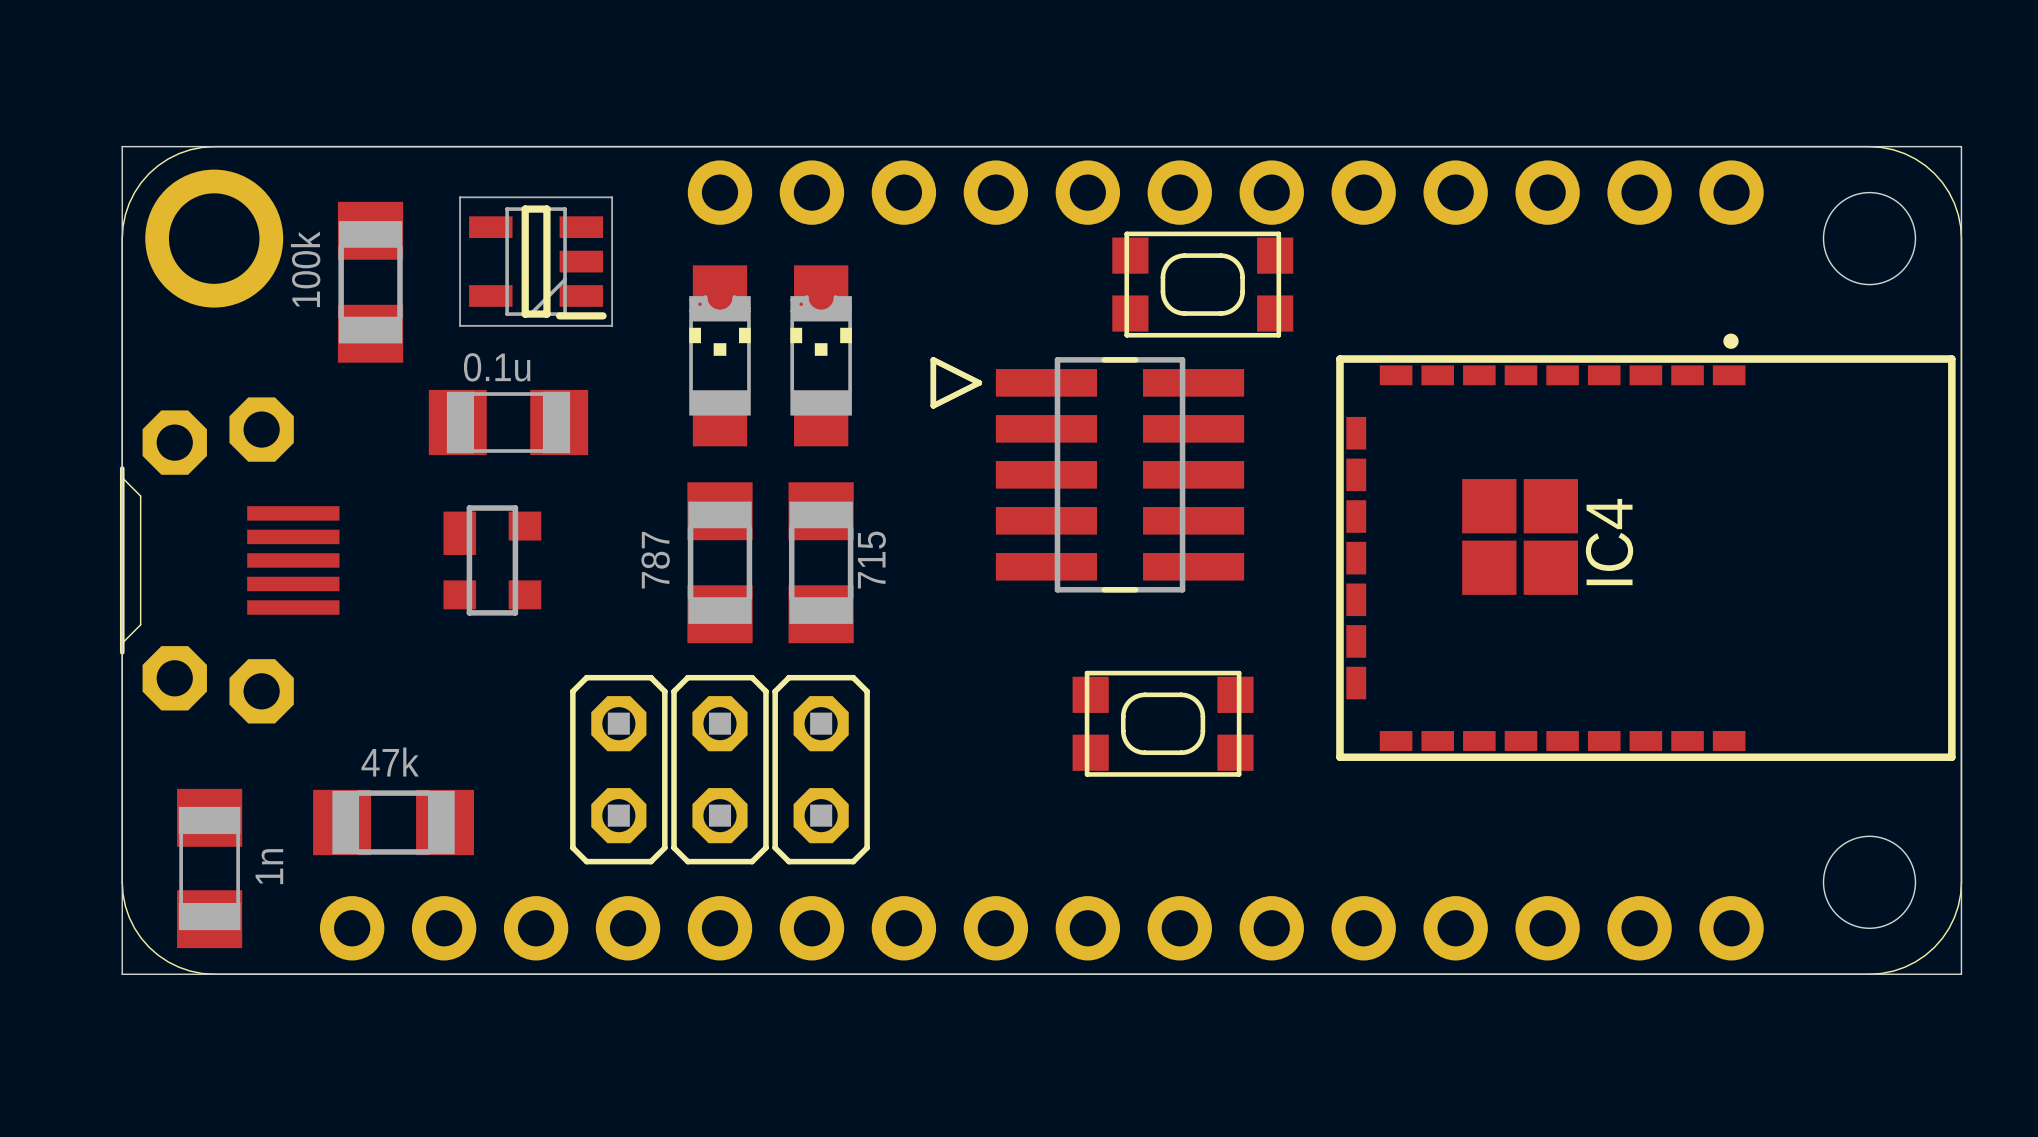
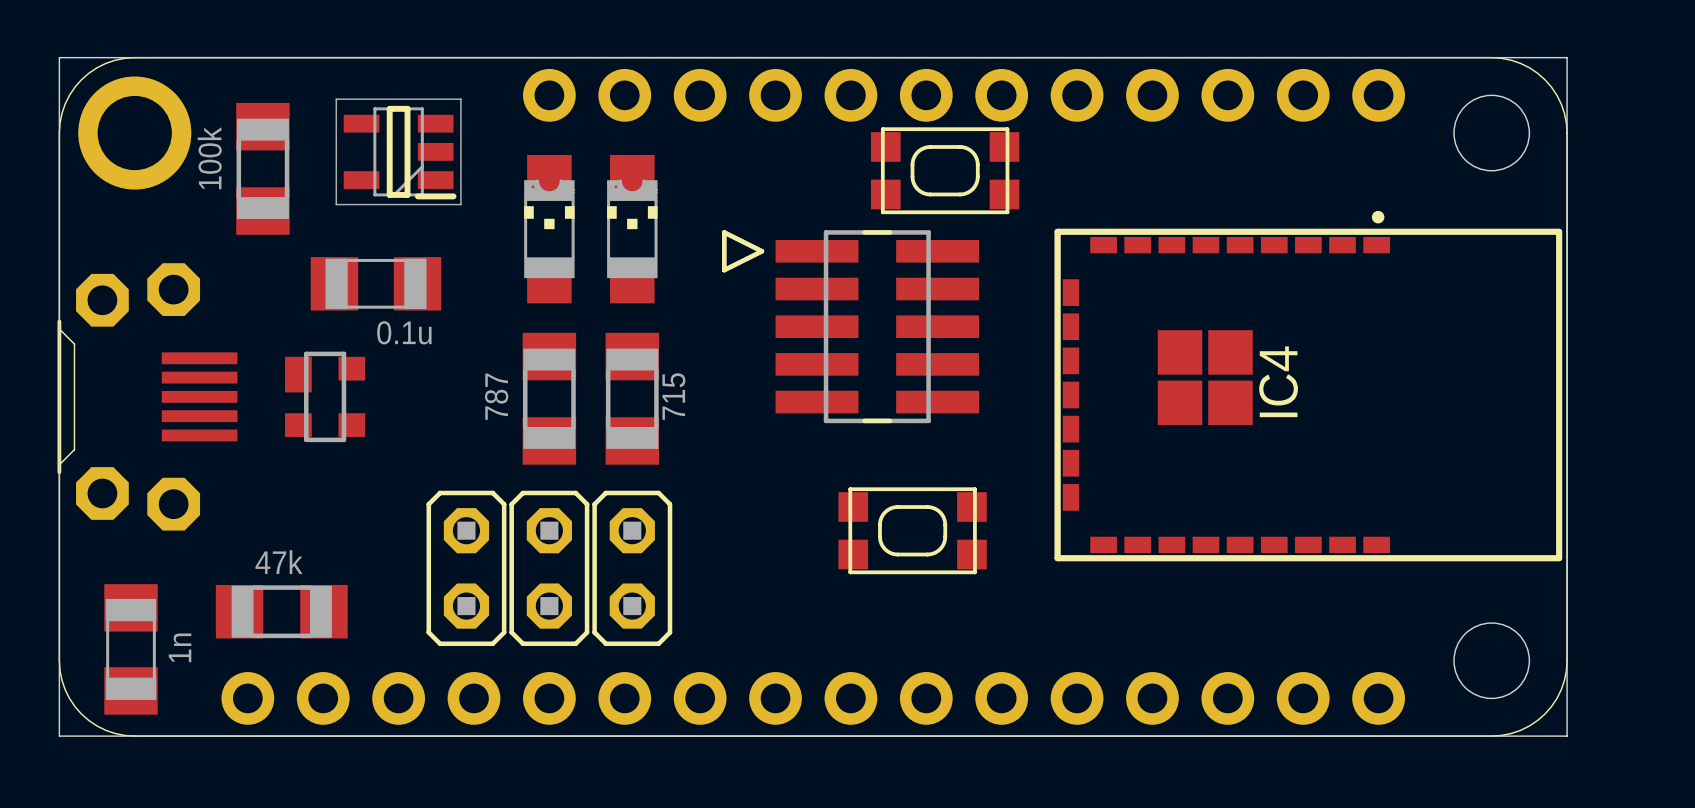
part value position: 0.1u (497, 367) -> 0.1u (404, 332)
part position: (492, 560) -> (325, 396)

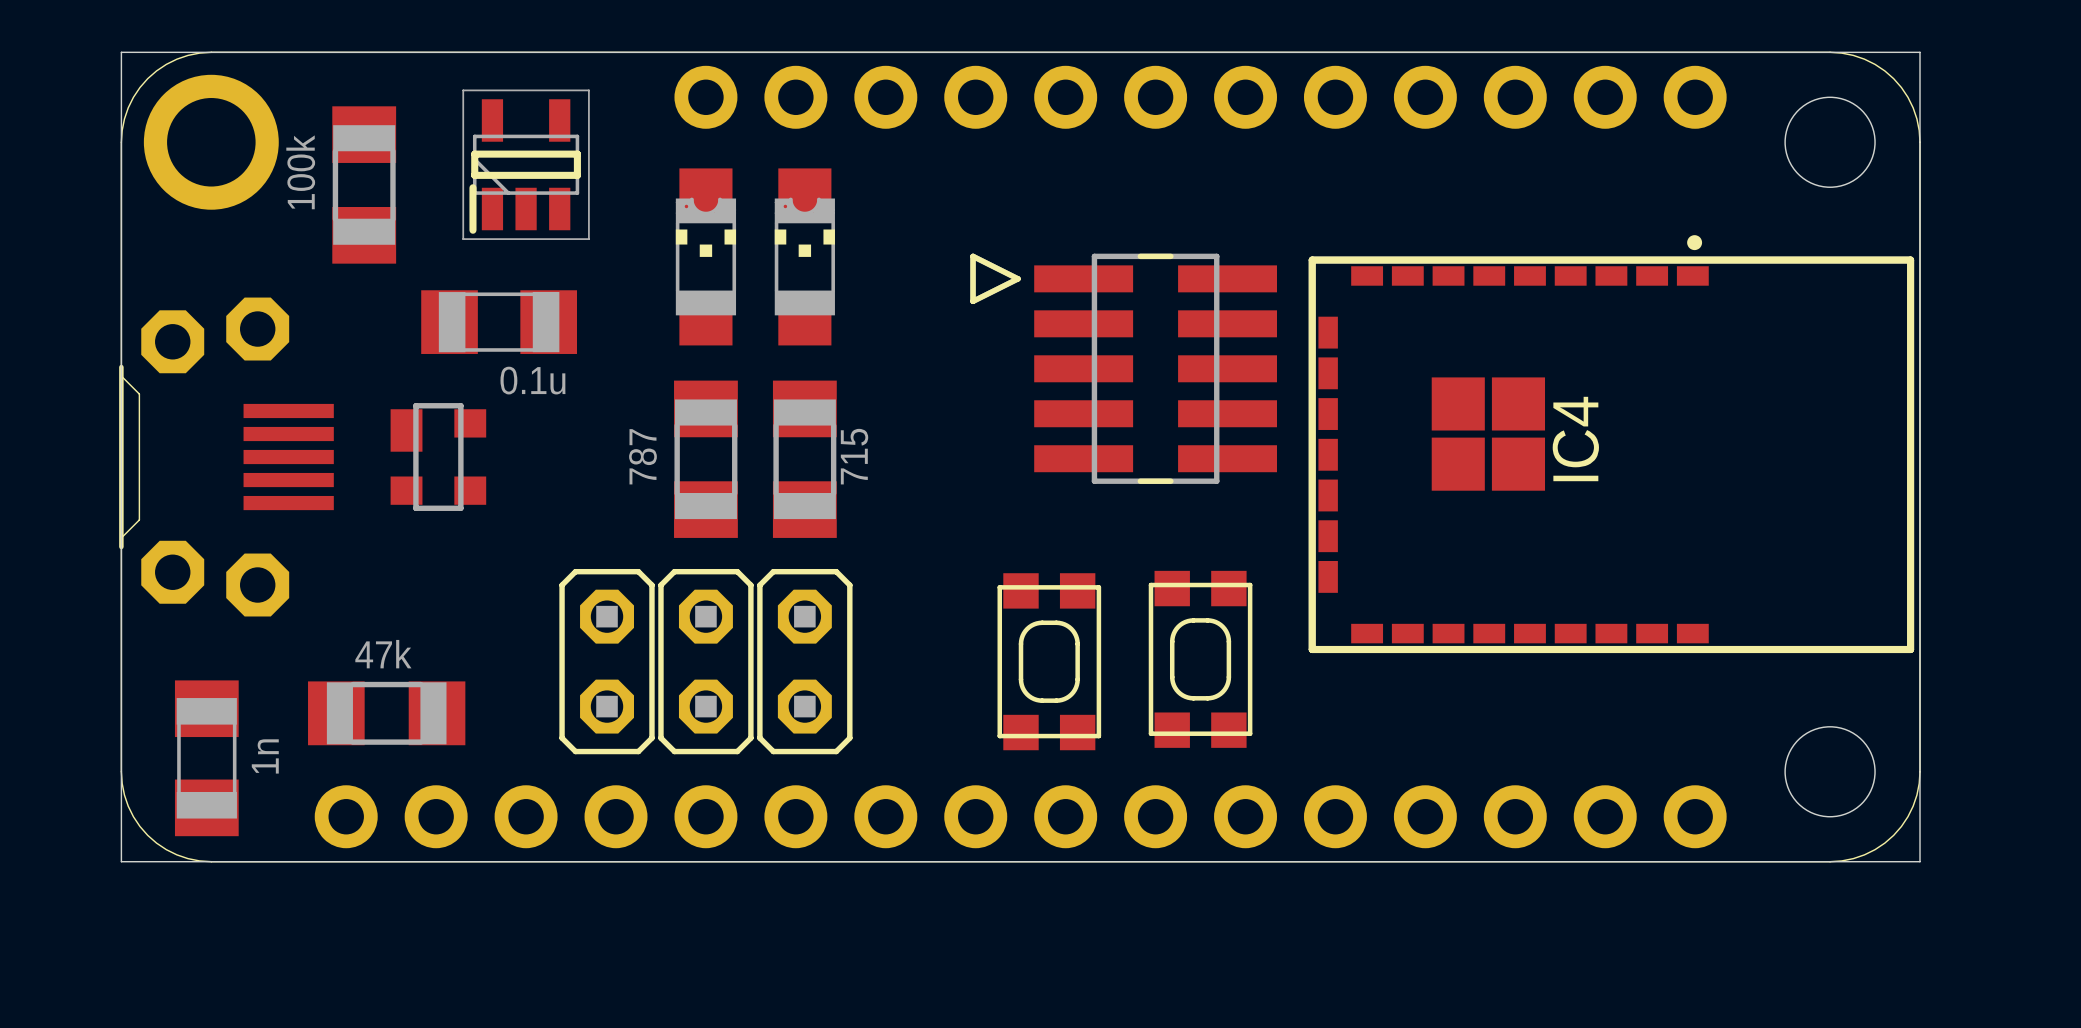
part rotation: 0° (398, 151) -> 90° clockwise (526, 164)
part: (945, 170) -> none
part position: (850, 326) -> (1123, 368)
part: (912, 530) -> none
part: none -> (1200, 659)
part: none -> (1049, 661)

